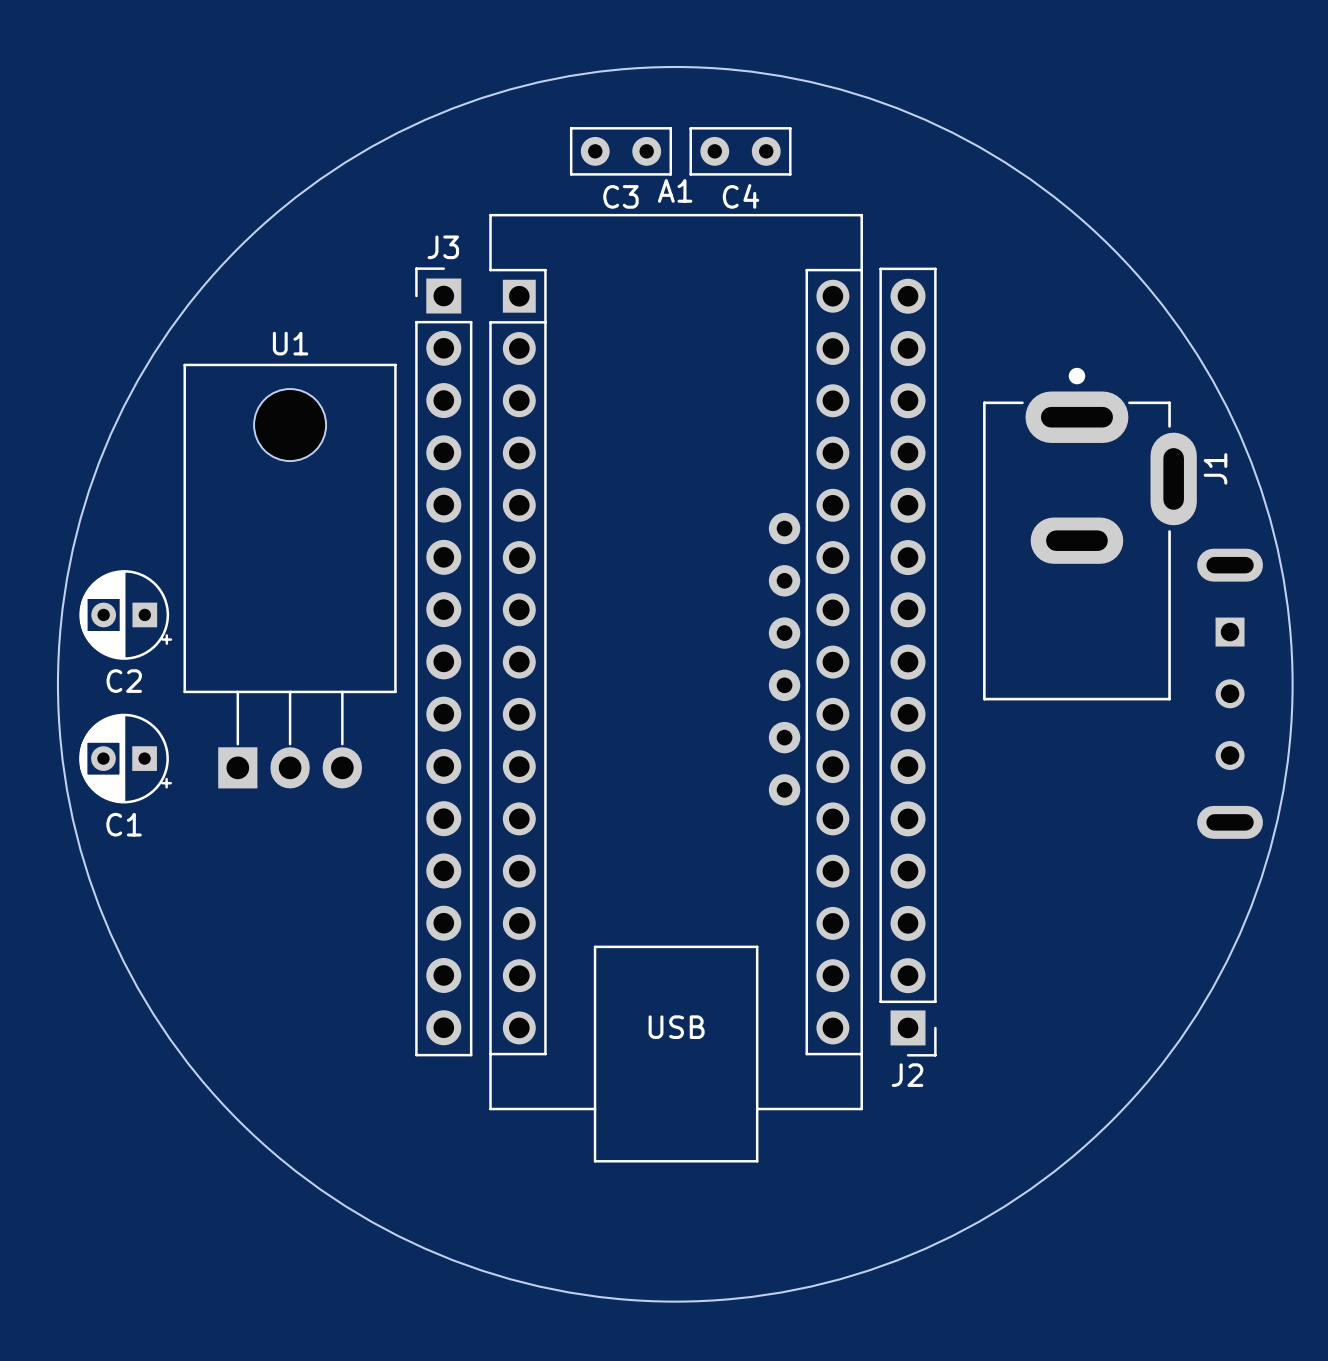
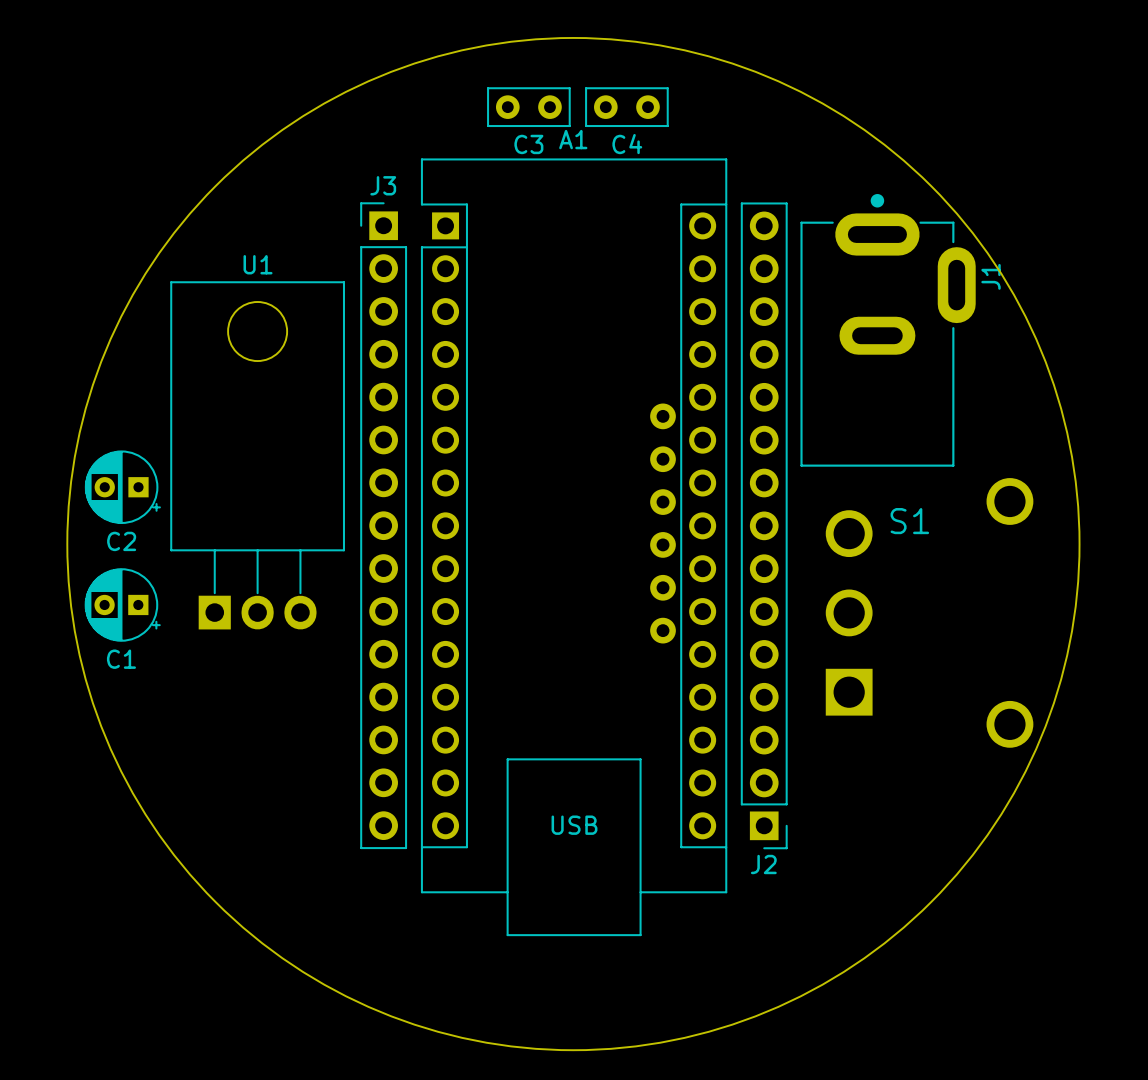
J1 position: (1089, 534) -> (888, 330)
part: (1230, 693) -> none
S1: none -> (929, 612)

